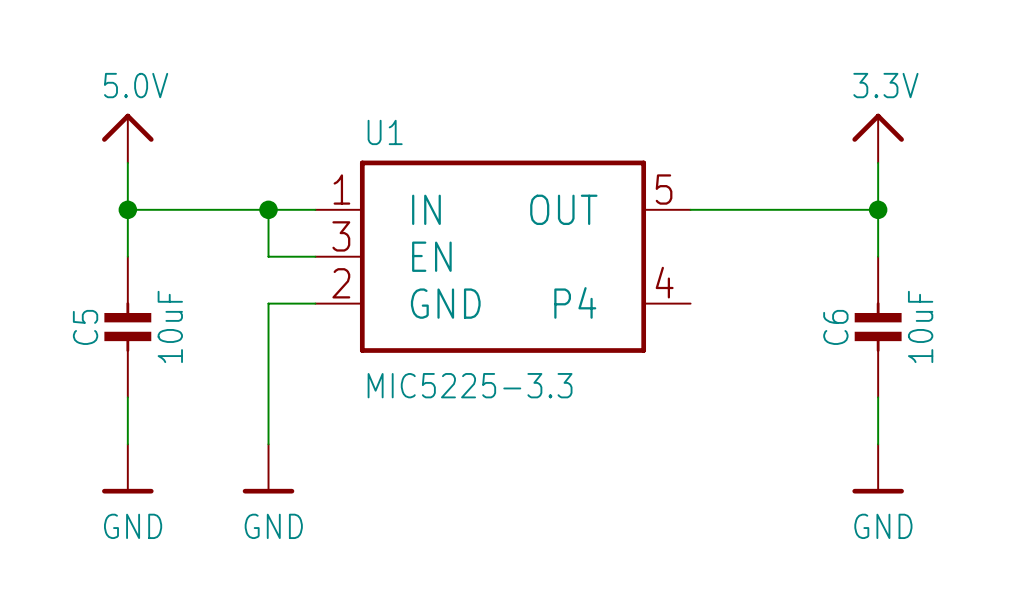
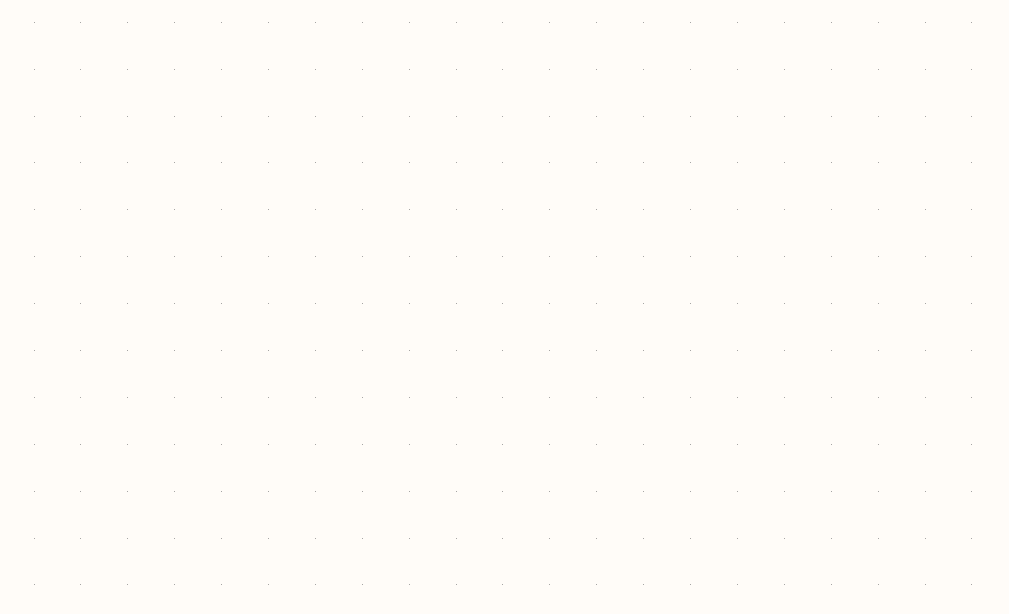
power symbol: 5.0V (127, 138) -> none
power symbol: 3.3V (878, 138) -> none
wire: (127, 162) (127, 256) -> none
wire: (878, 162) (878, 256) -> none
wire: (127, 209) (315, 209) -> none
junction: (127, 209) -> none
wire: (268, 209) (268, 256) (315, 256) -> none
junction: (268, 209) -> none
wire: (690, 209) (878, 209) -> none
junction: (878, 209) -> none
U1: MIC5225-3.3 (502, 256) -> none
wire: (315, 303) (268, 303) (268, 444) -> none
C5: 10uF (127, 327) -> none
C6: 10uF (878, 327) -> none
wire: (127, 397) (127, 444) -> none
wire: (878, 397) (878, 444) -> none
power symbol: GND (127, 468) -> none
power symbol: GND (268, 468) -> none
power symbol: GND (878, 468) -> none

